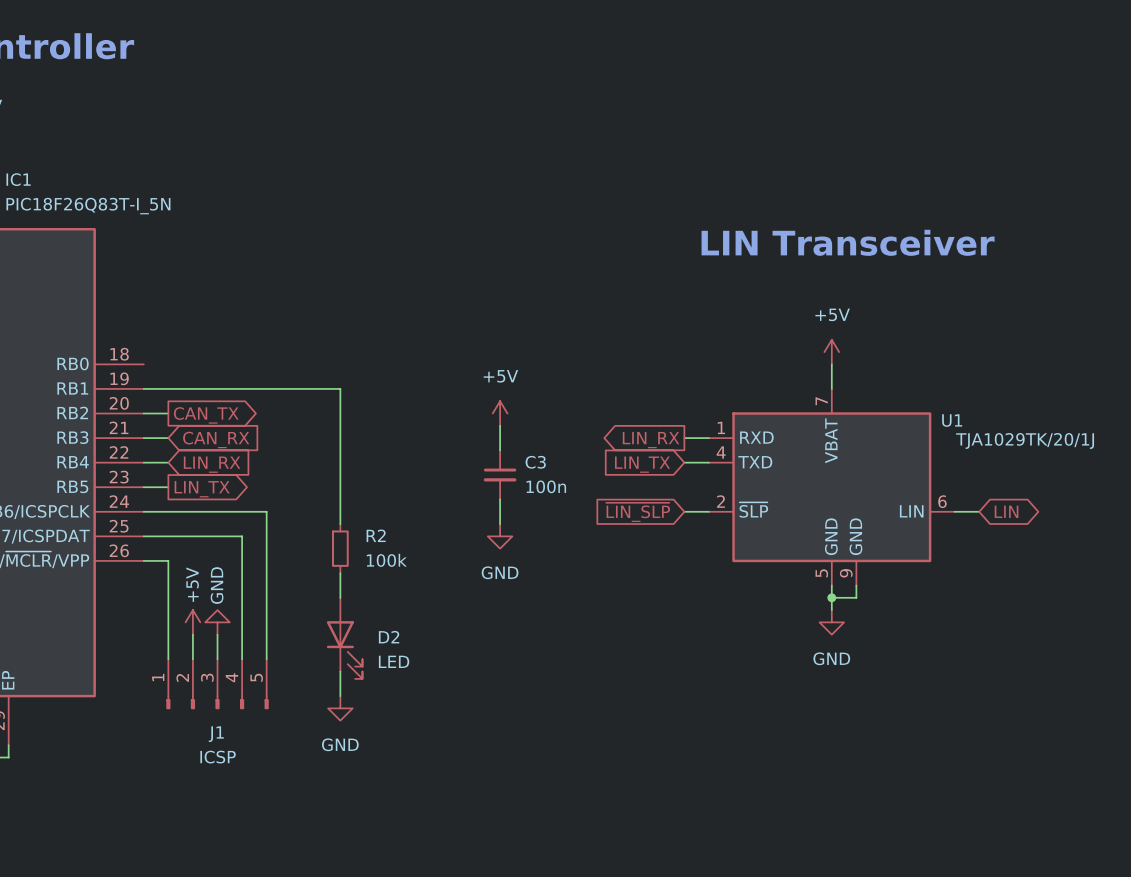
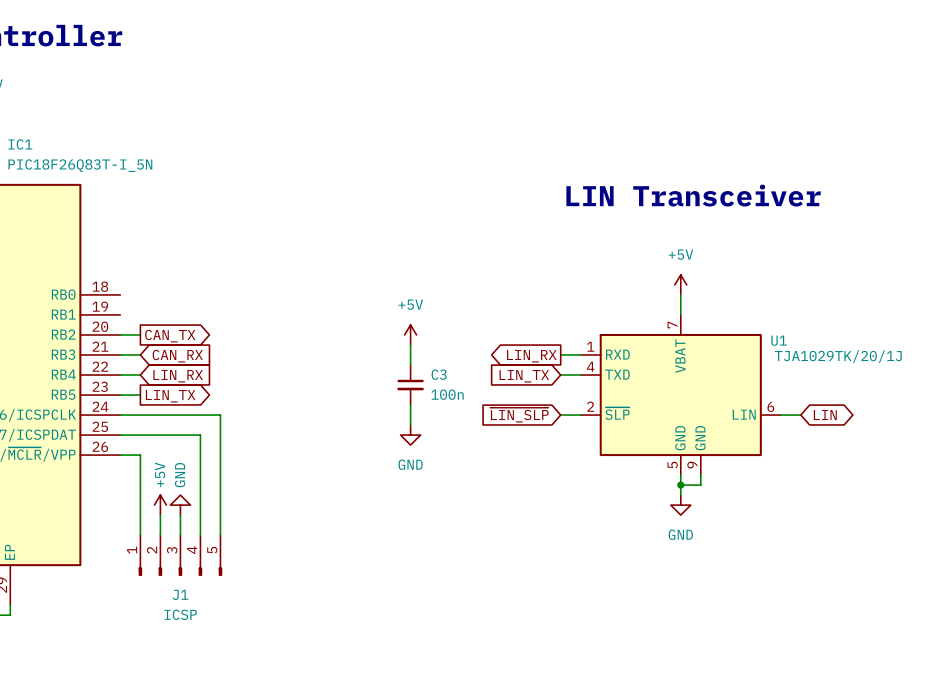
wire: (143, 388) (340, 388) (340, 524) -> none
R2: 100k (340, 548) -> none
wire: (340, 573) (340, 597) -> none
D2: LED (344, 638) -> none
wire: (340, 671) (340, 696) -> none
power symbol: GND (340, 708) -> none

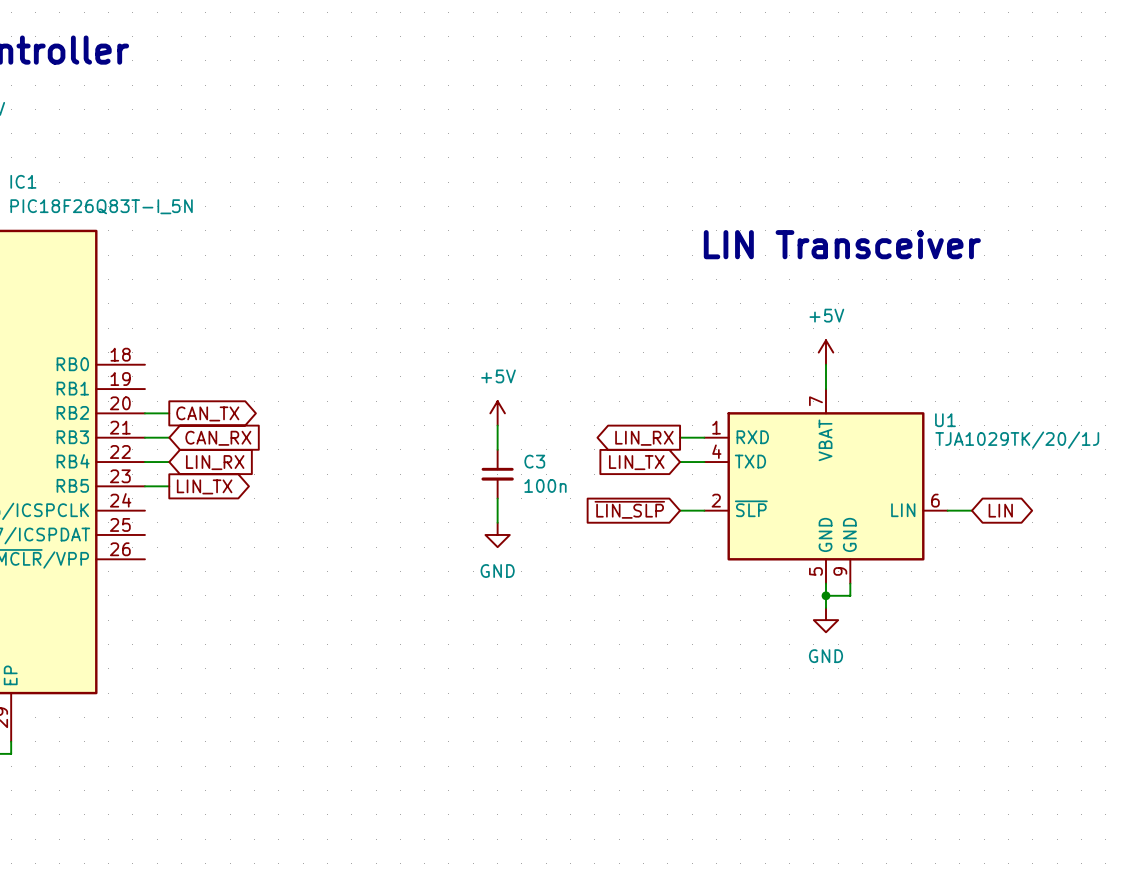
wire: (120, 415) (220, 415) (220, 535) -> none
wire: (120, 435) (200, 435) (200, 535) -> none
wire: (120, 455) (140, 455) (140, 535) -> none
power symbol: +5V (160, 505) -> none
power symbol: GND (180, 505) -> none
wire: (160, 515) (160, 535) -> none
wire: (180, 515) (180, 535) -> none
J1: ICSP (180, 555) -> none

